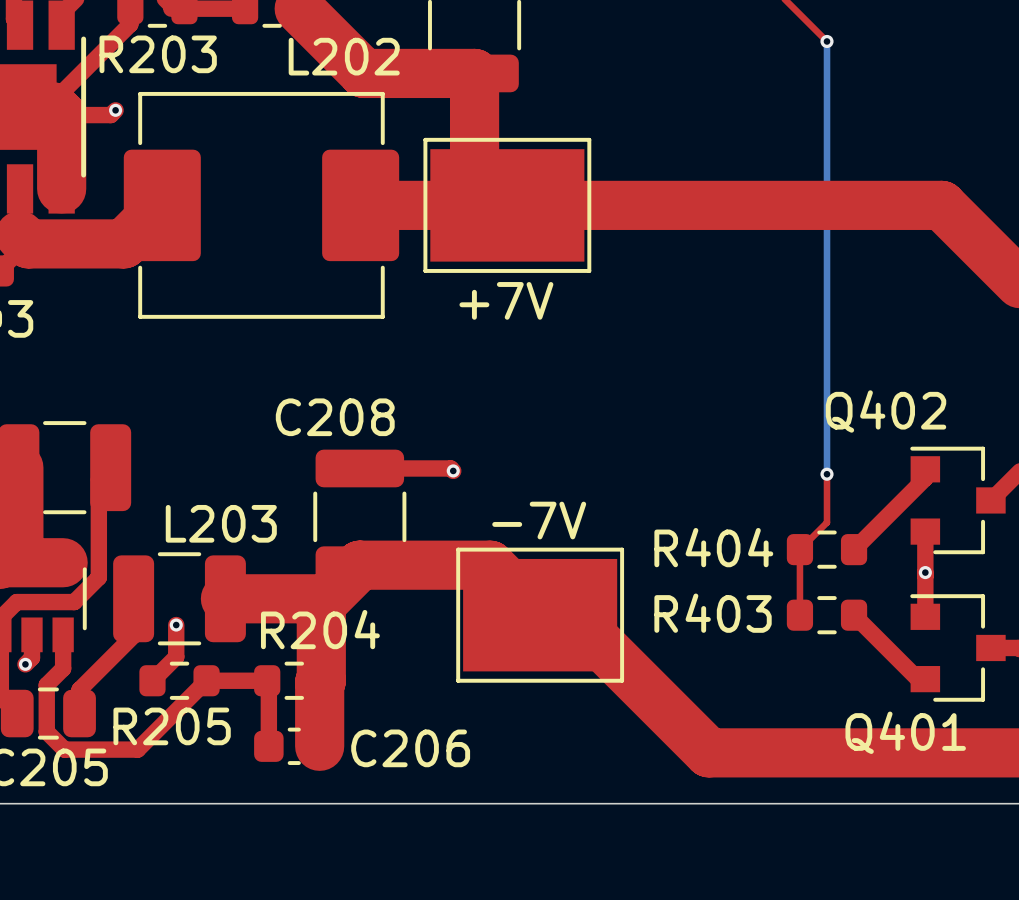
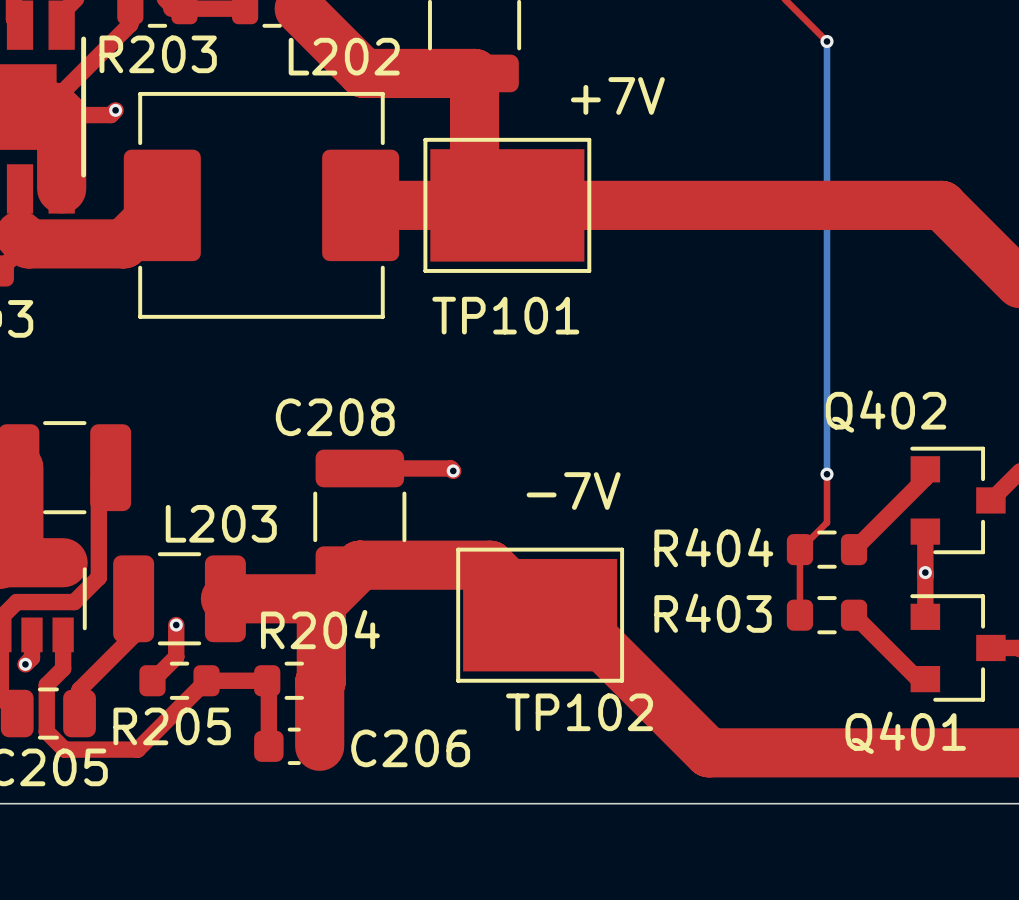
text position: +7V (506, 300) -> +7V (617, 95)
TP101 name: none -> TP101 (505, 315)
text position: -7V (539, 520) -> -7V (573, 491)
TP102 name: none -> TP102 (579, 712)

